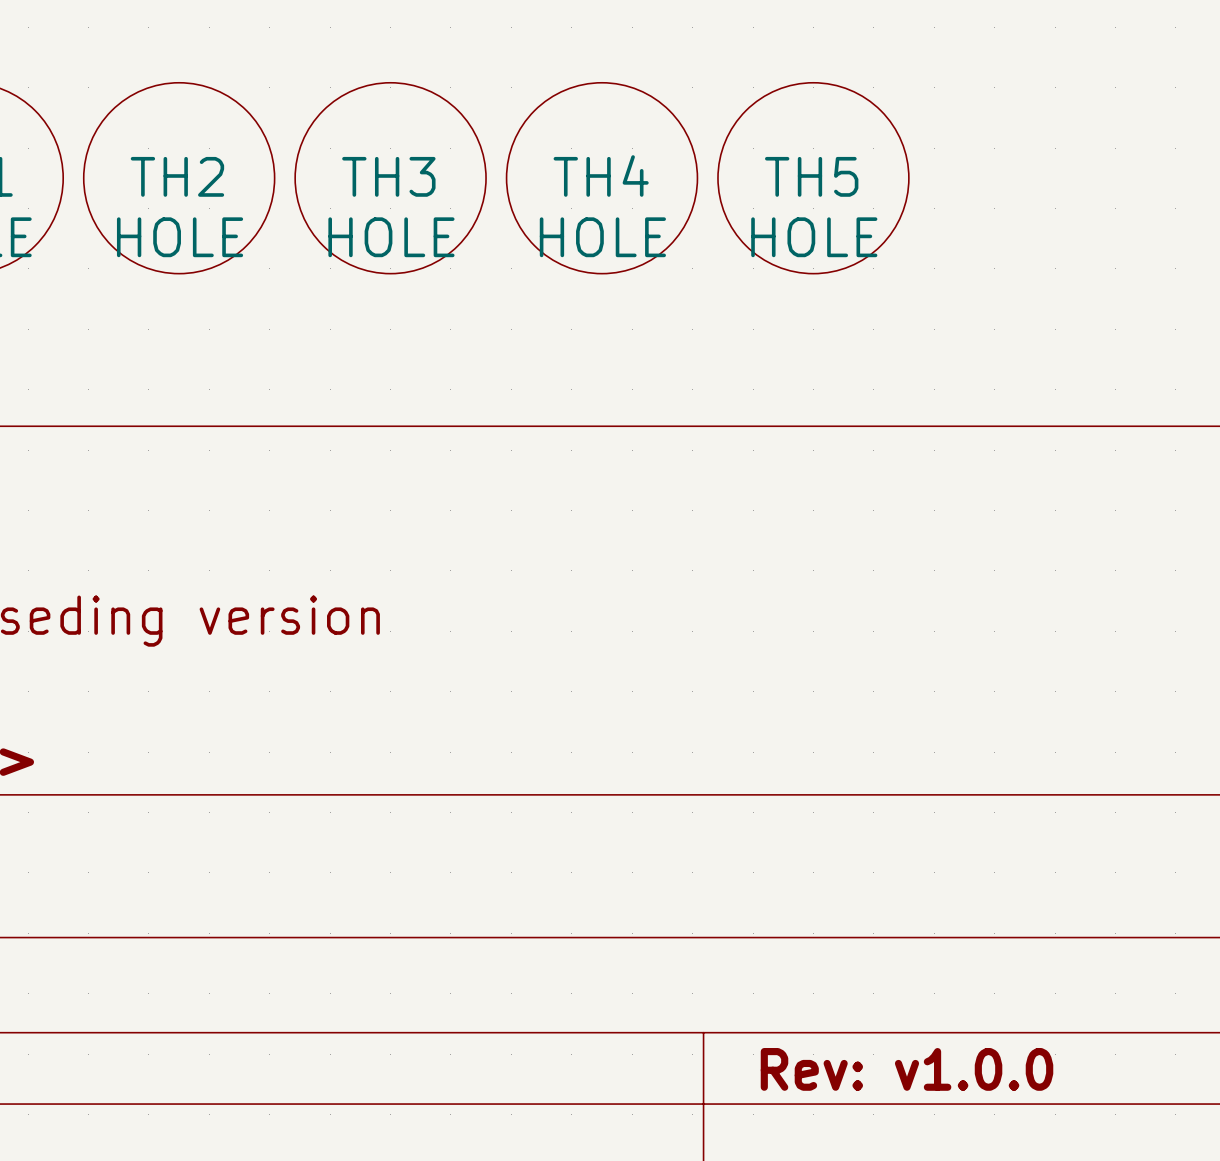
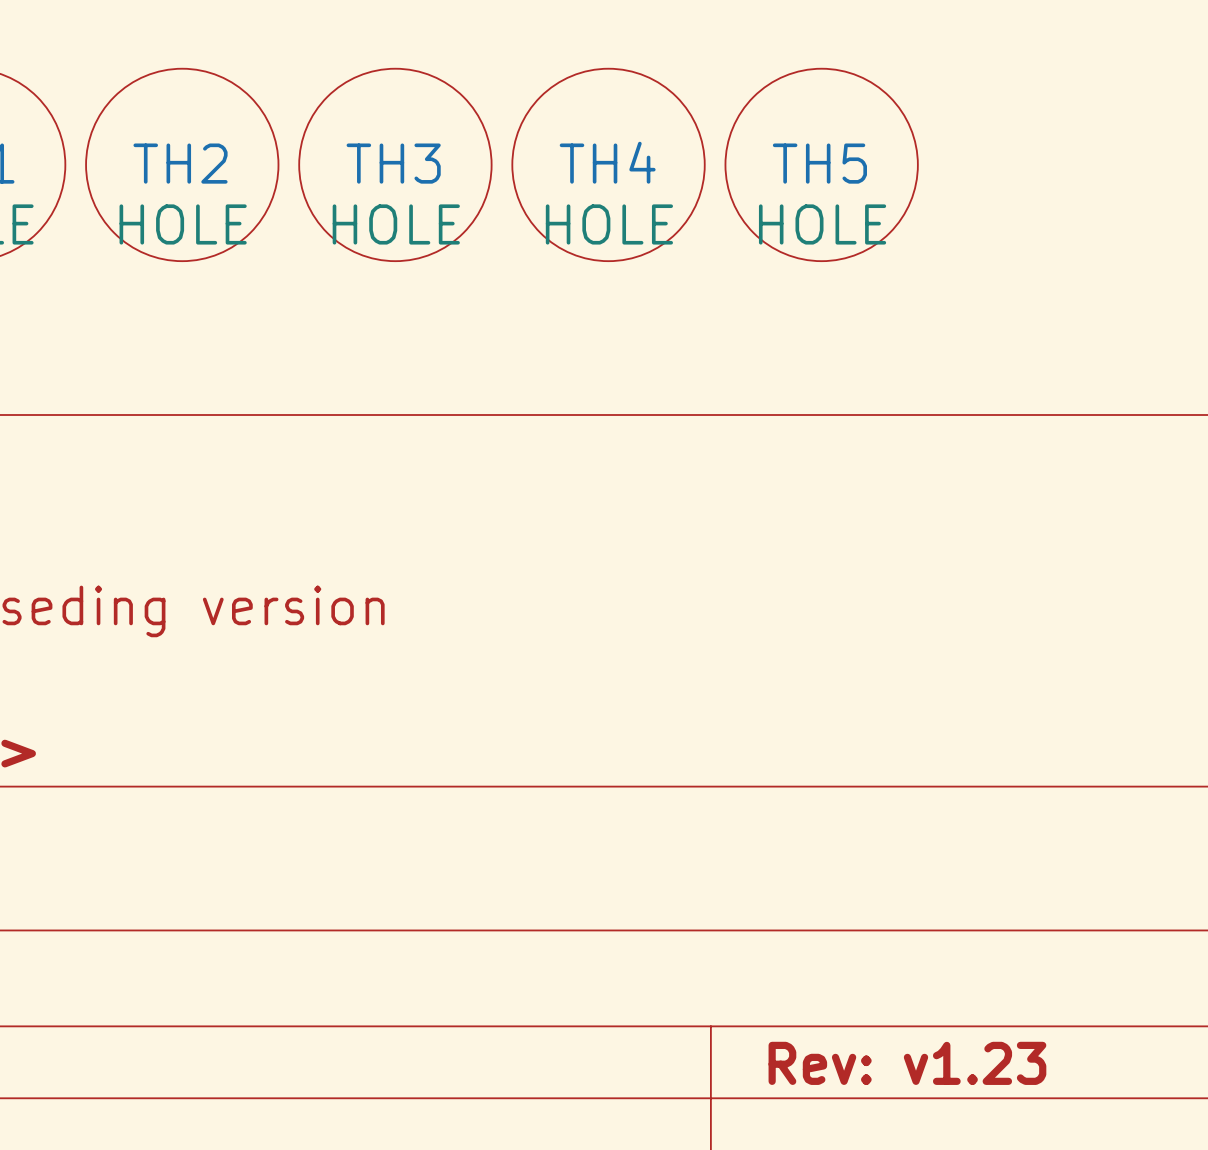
title block: Rev: v1.0.0 (907, 1069) -> Rev: v1.23 (907, 1063)

